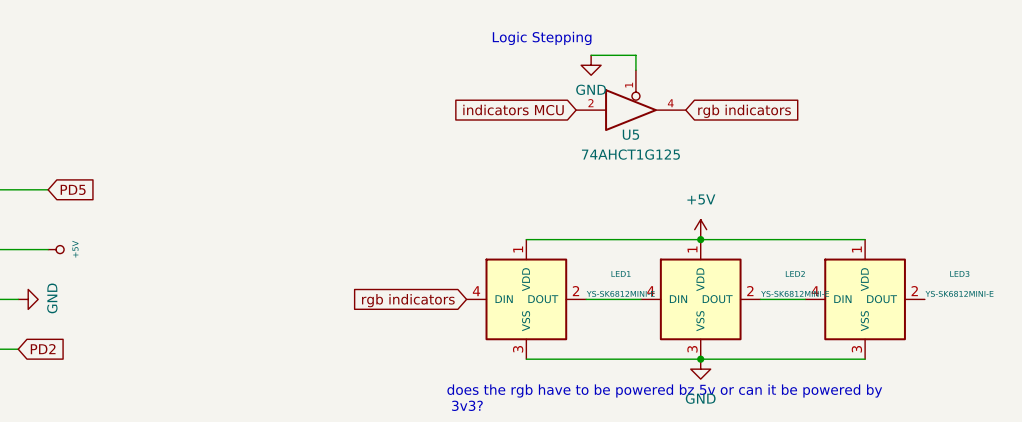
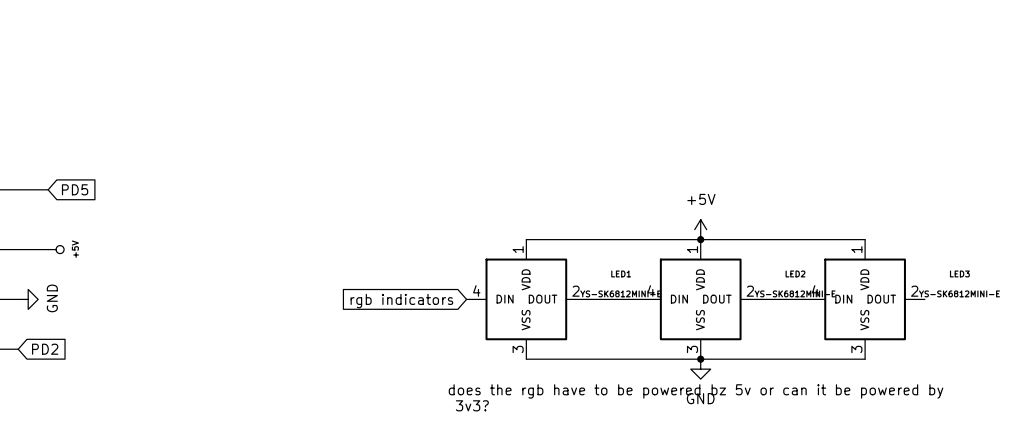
text: Logic Stepping (542, 38) -> none
wire: (591, 55) (635, 55) (635, 70) -> none
power symbol: GND (591, 65) -> none
U5: 74AHCT1G125 (630, 100) -> none
global label: indicators MCU (513, 109) -> none
global label: rgb indicators (744, 111) -> none

